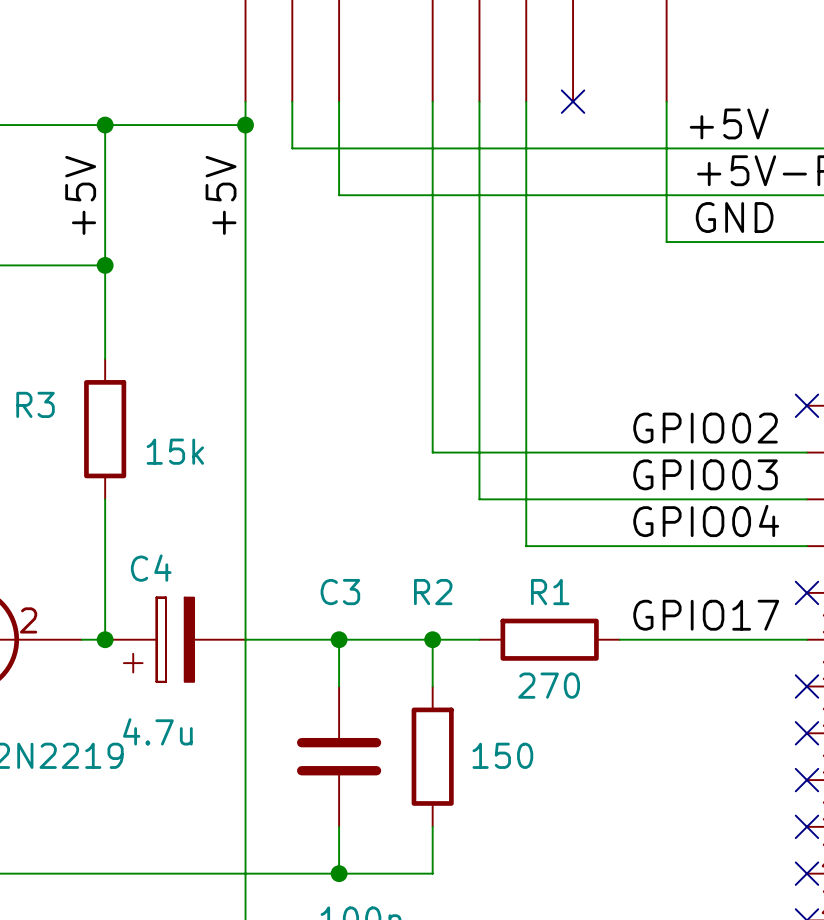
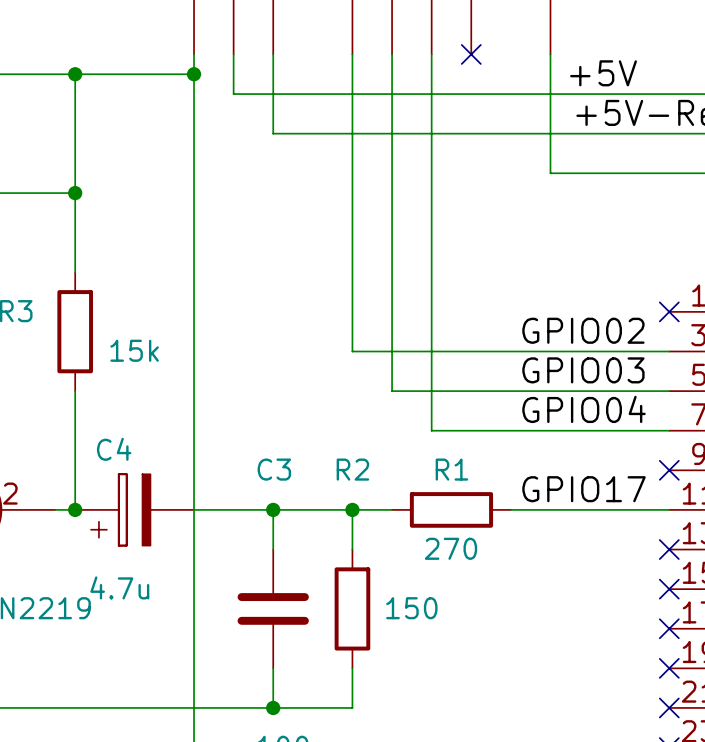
label: +5V (80, 195) -> none
label: +5V (221, 195) -> none
label: GND (734, 217) -> none

